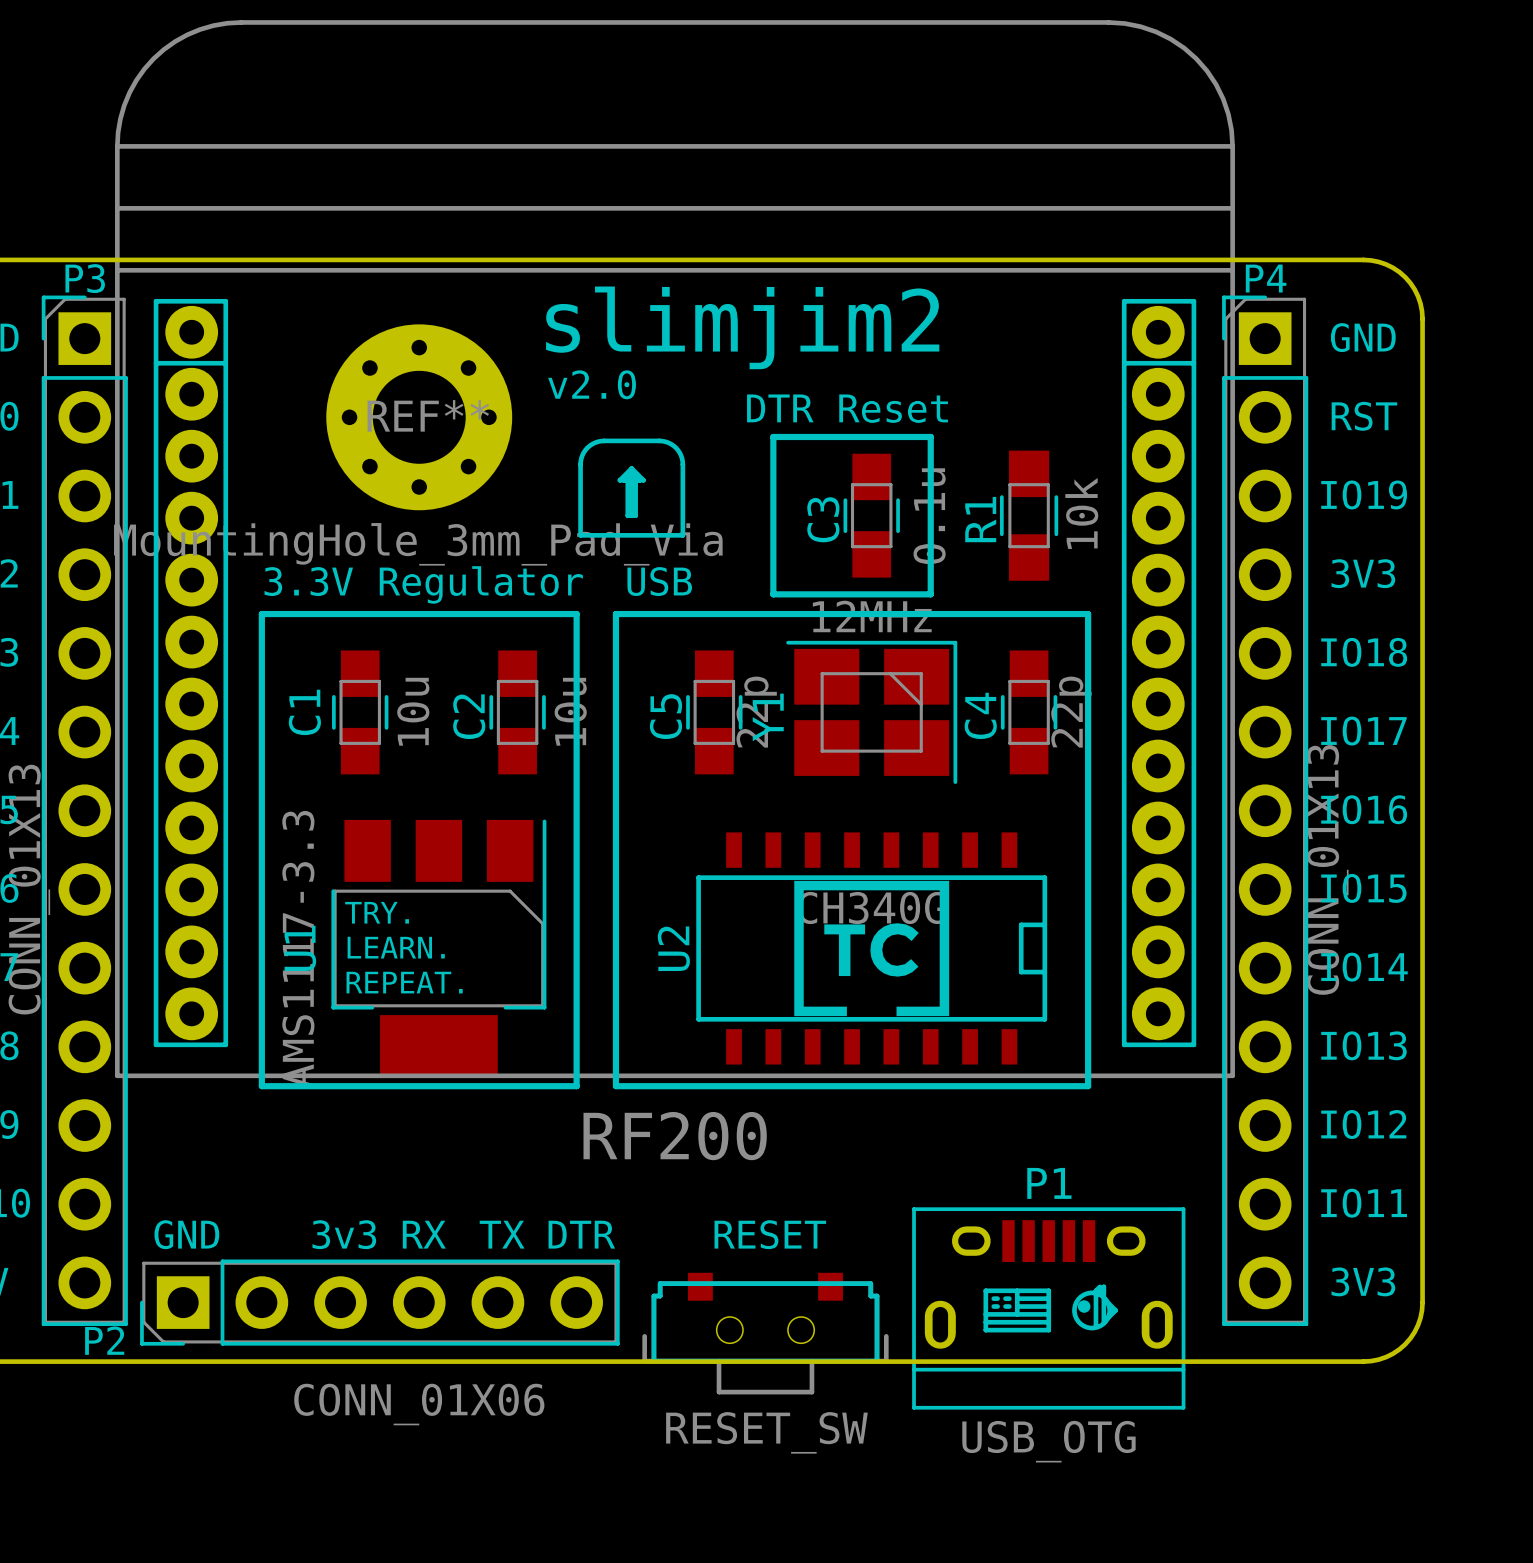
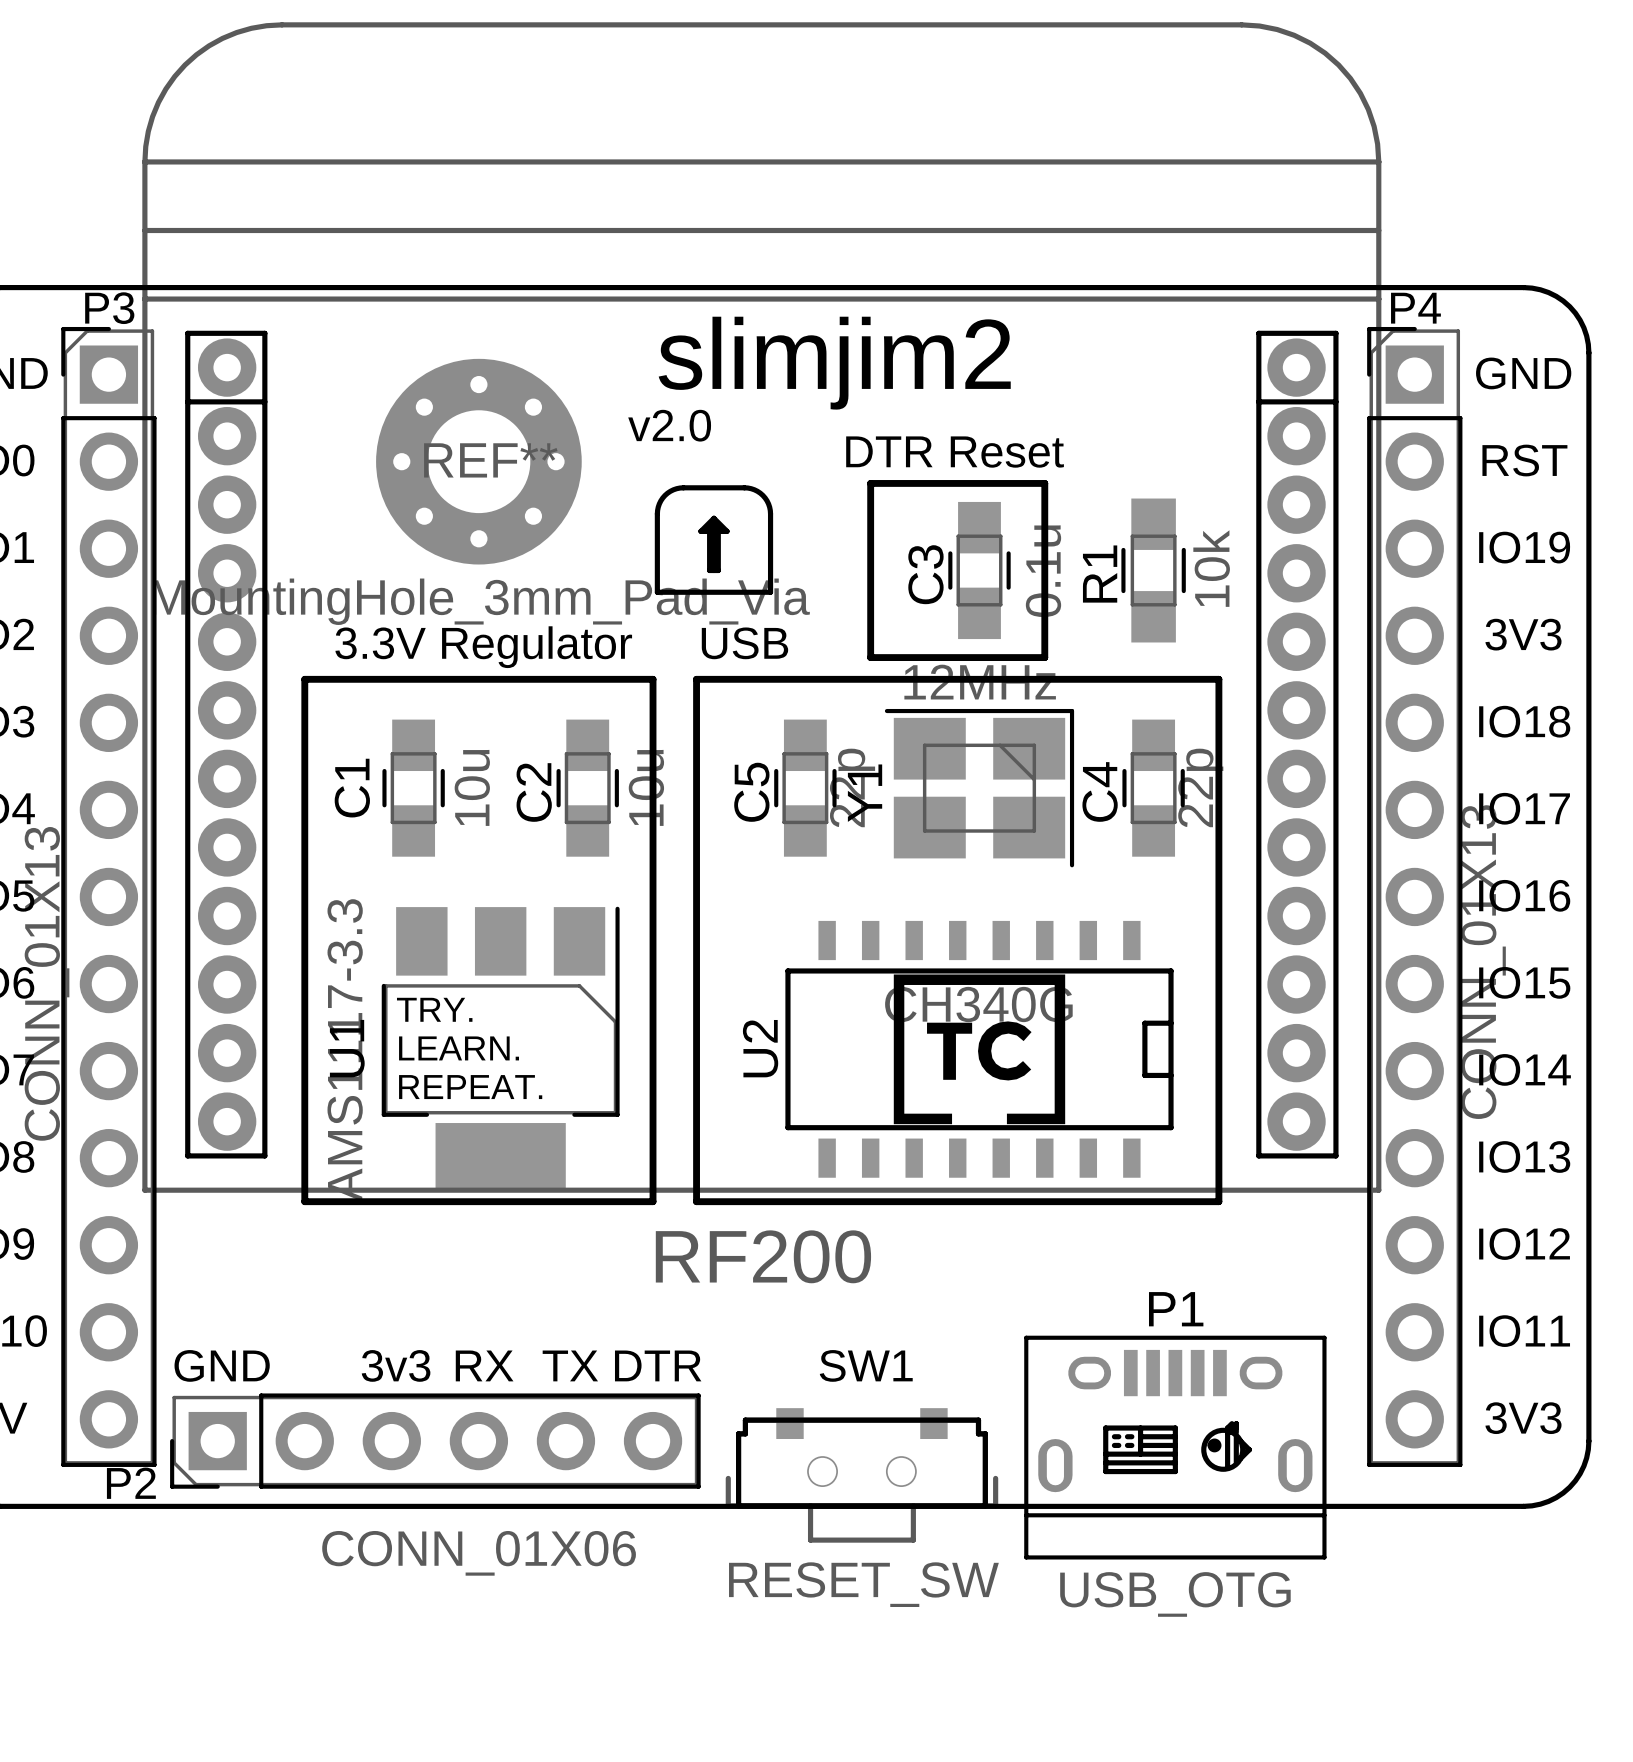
RESET name: RESET (770, 1234) -> SW1 (866, 1365)

